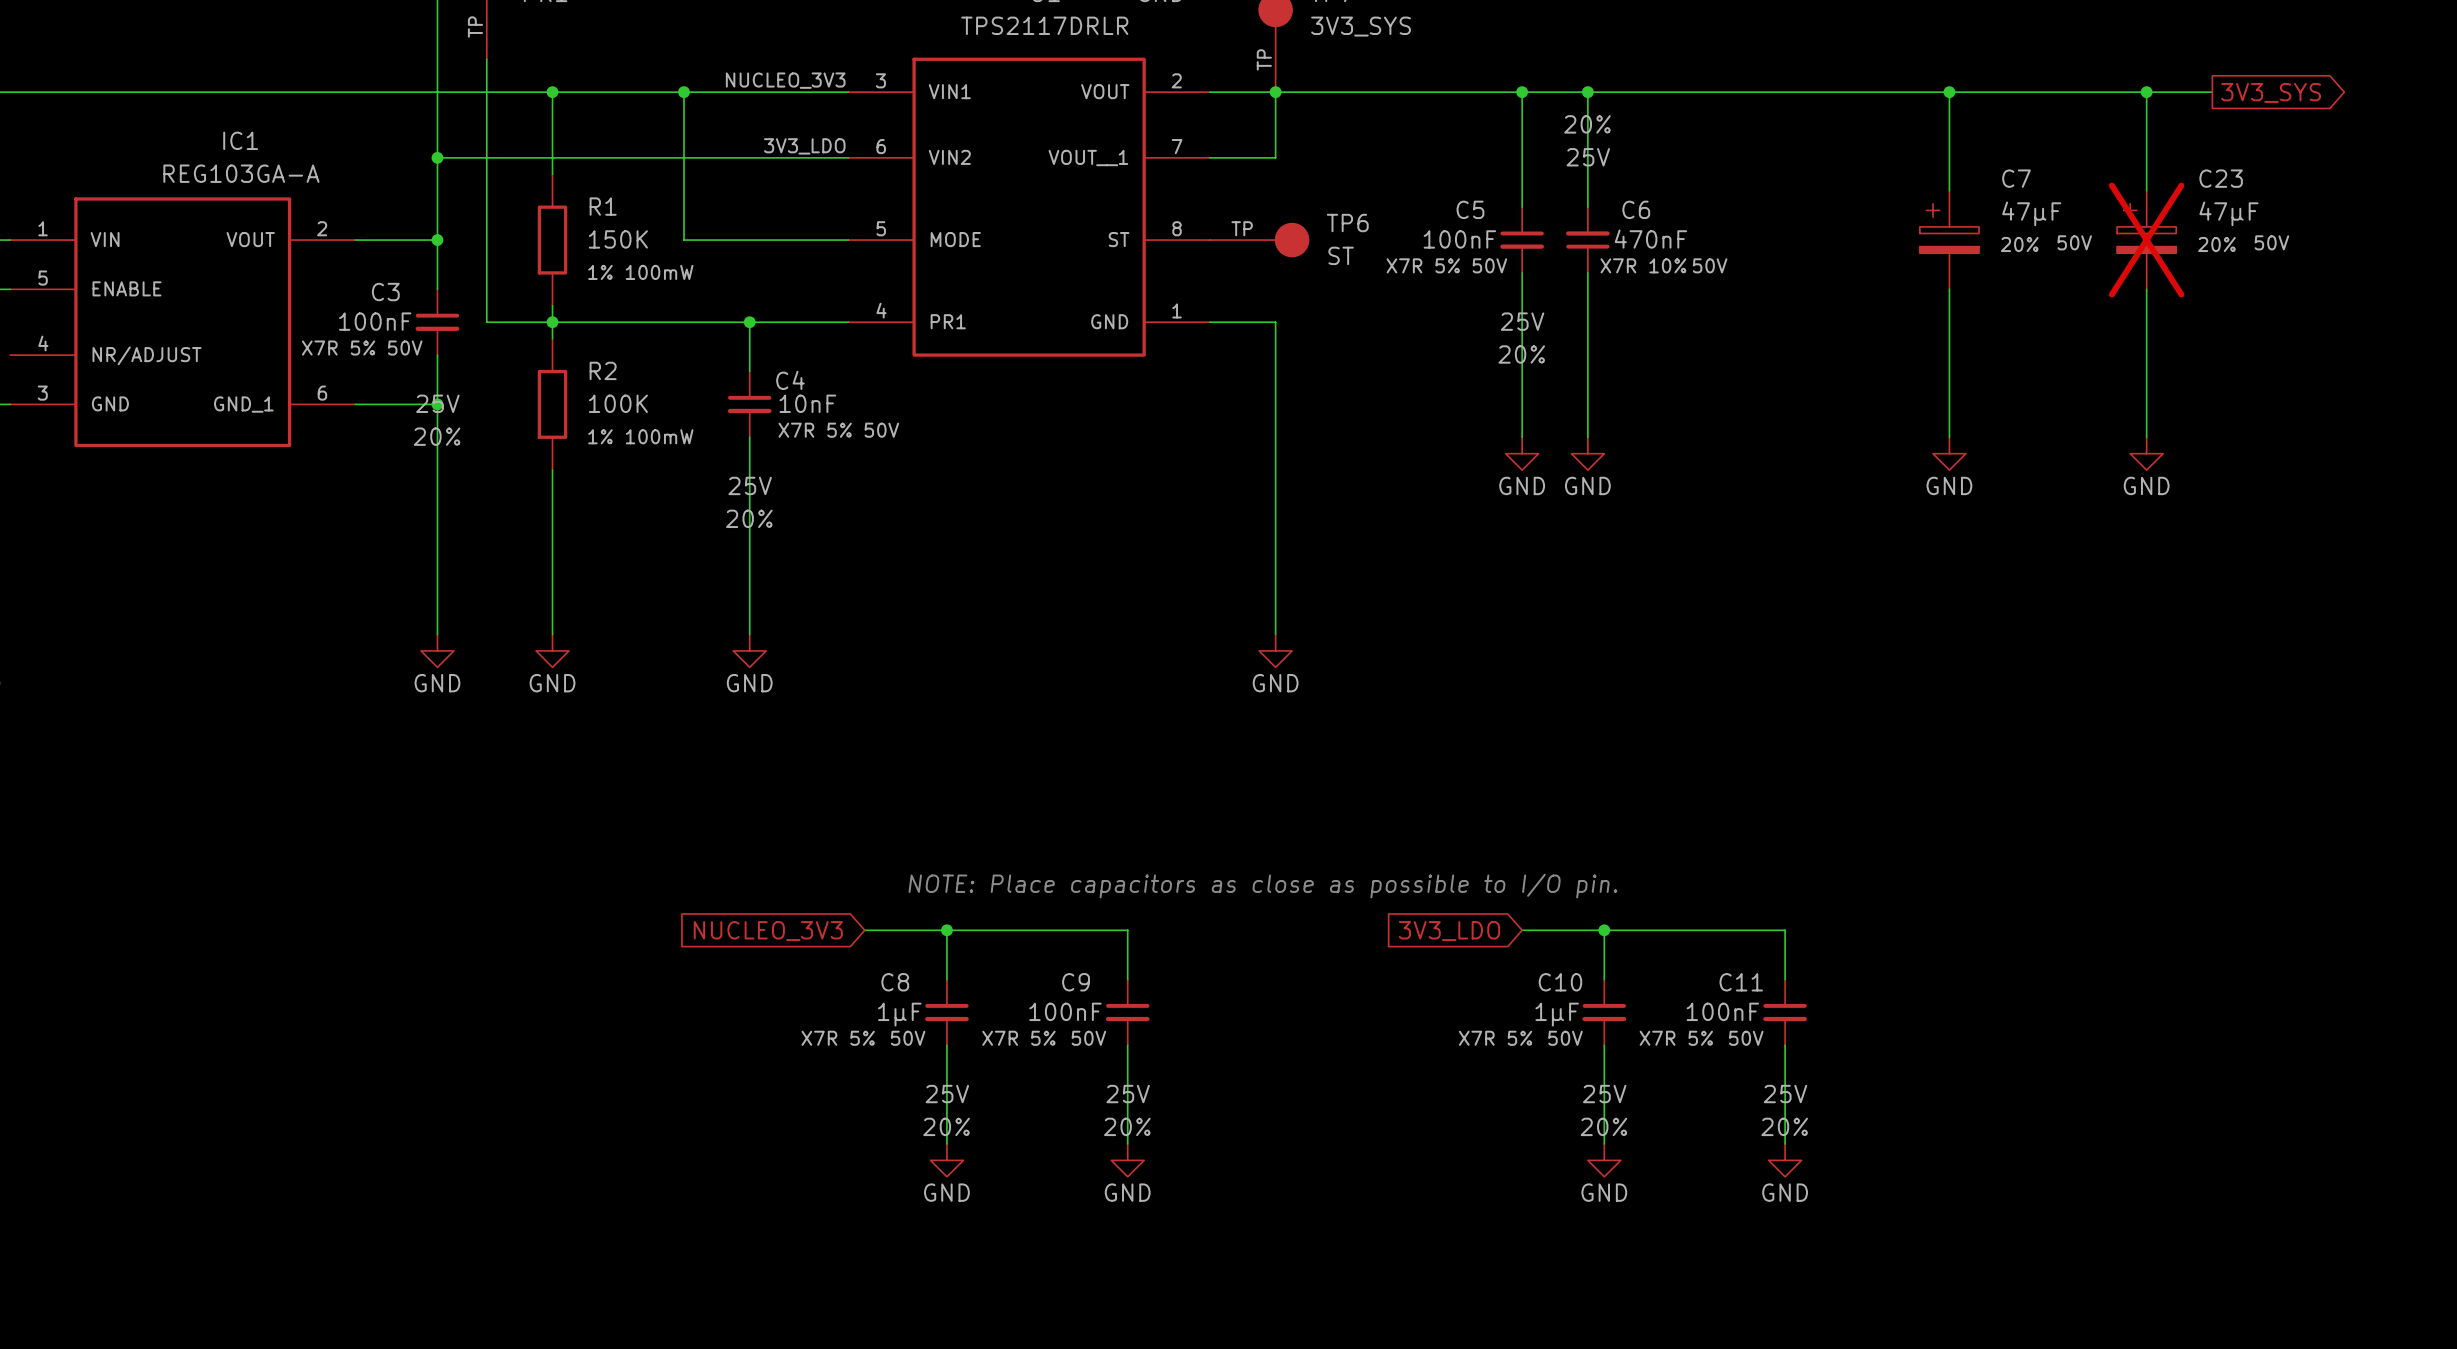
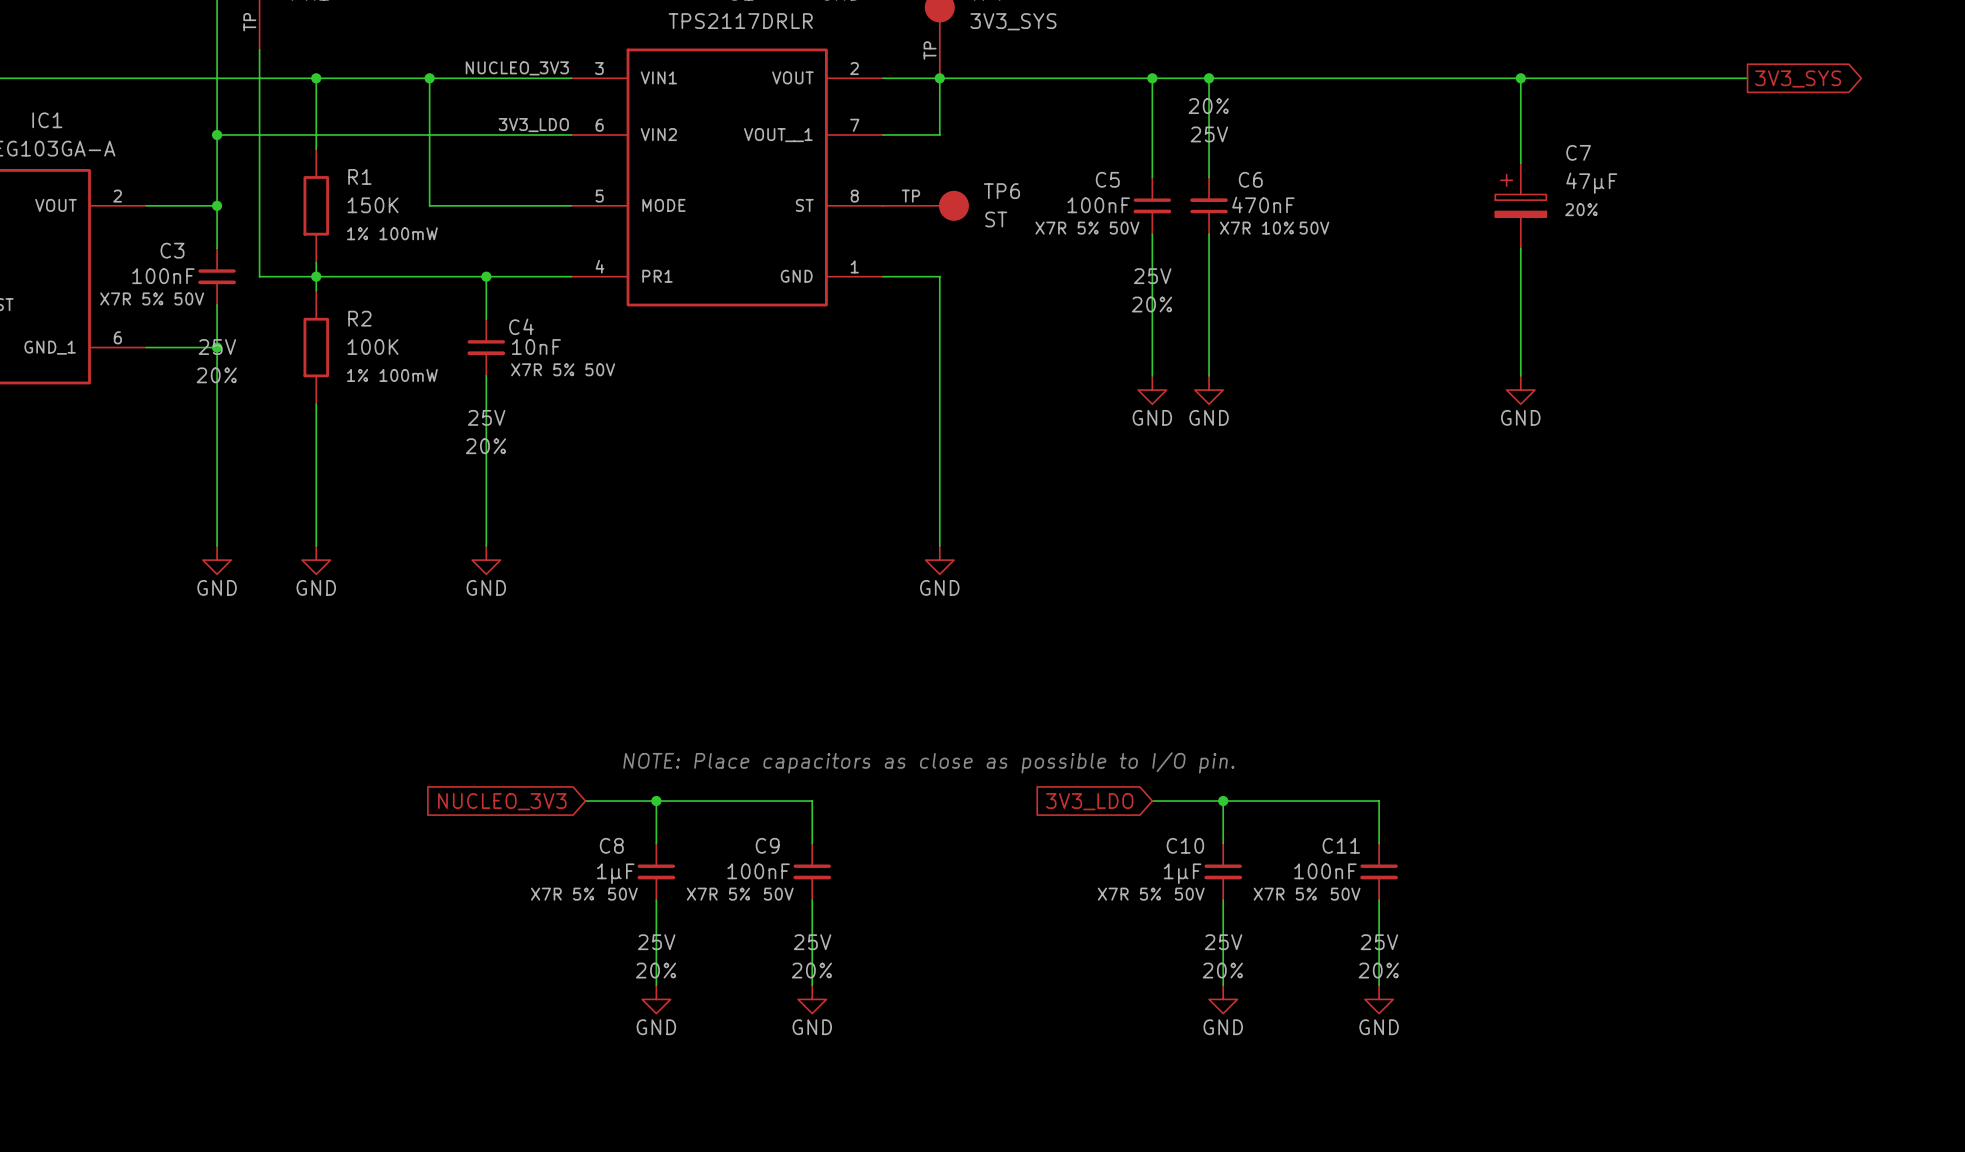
wire: (2146, 92) (2146, 190) -> none
junction: (2146, 92) -> none
C23: 47µF (2146, 240) -> none
C7 text: 50V (2074, 242) -> none
wire: (2146, 289) (2146, 437) -> none
power symbol: GND (2146, 453) -> none

